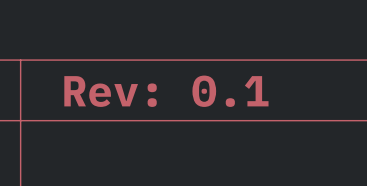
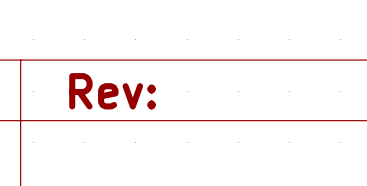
title block: Rev: 0.1 (166, 91) -> Rev: (112, 91)

